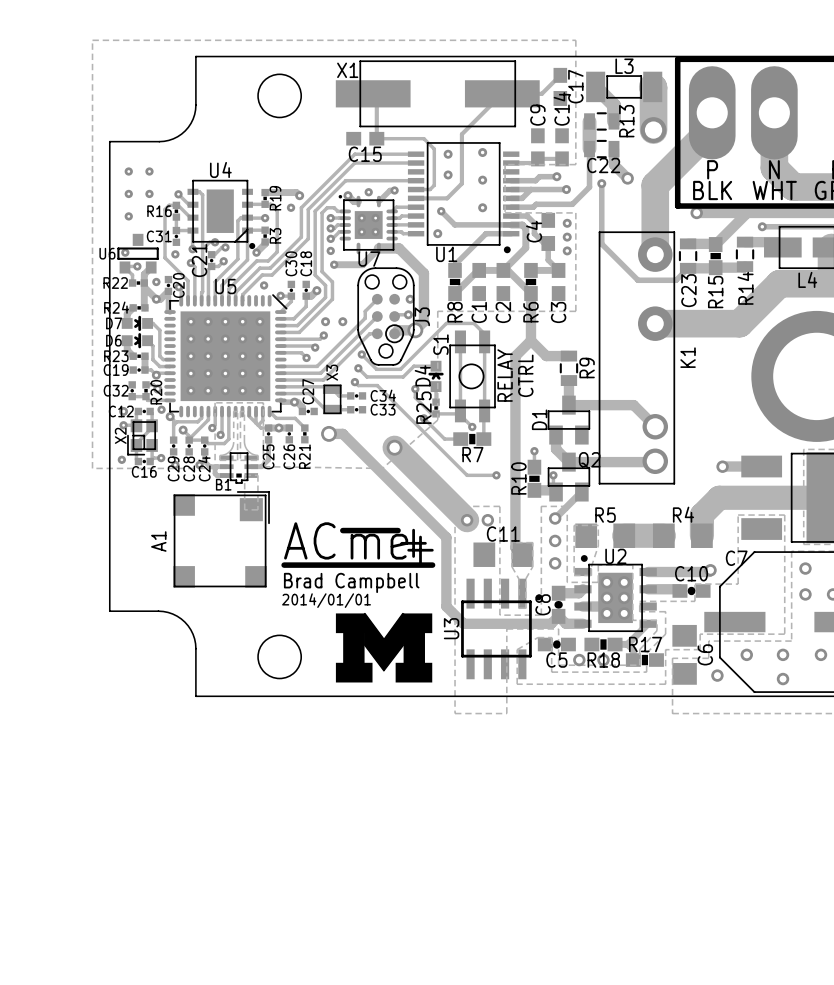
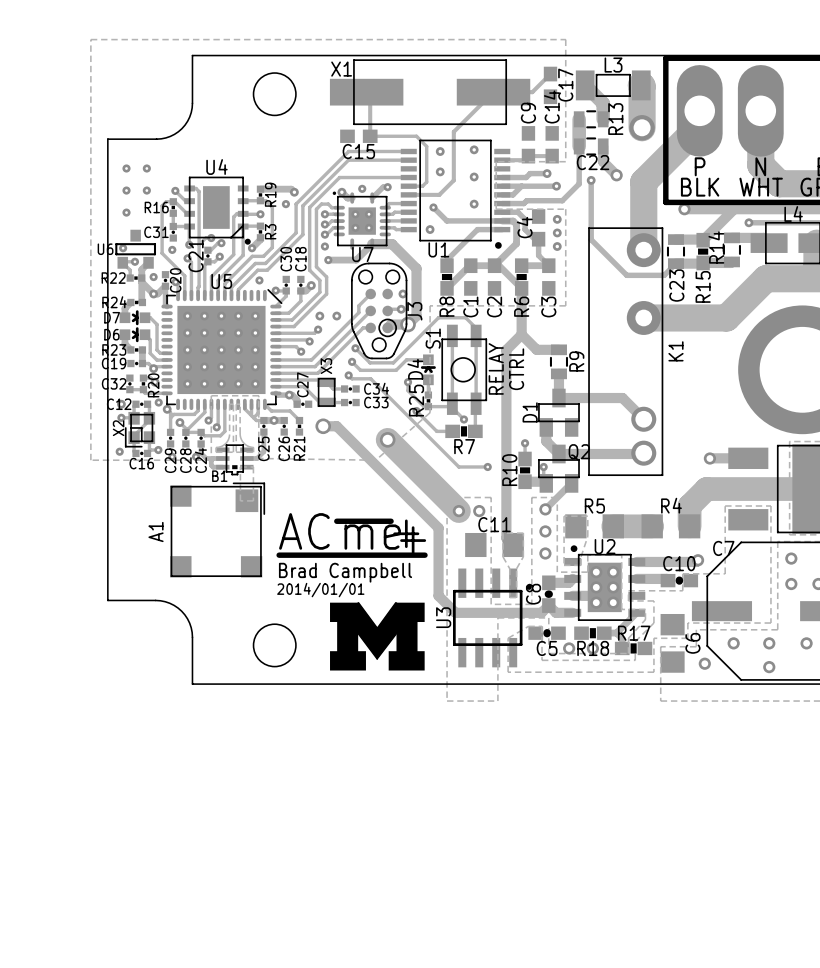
L4 name position: L4 (807, 279) -> L4 (793, 213)
R14 name position: R14 (745, 288) -> R14 (716, 247)

